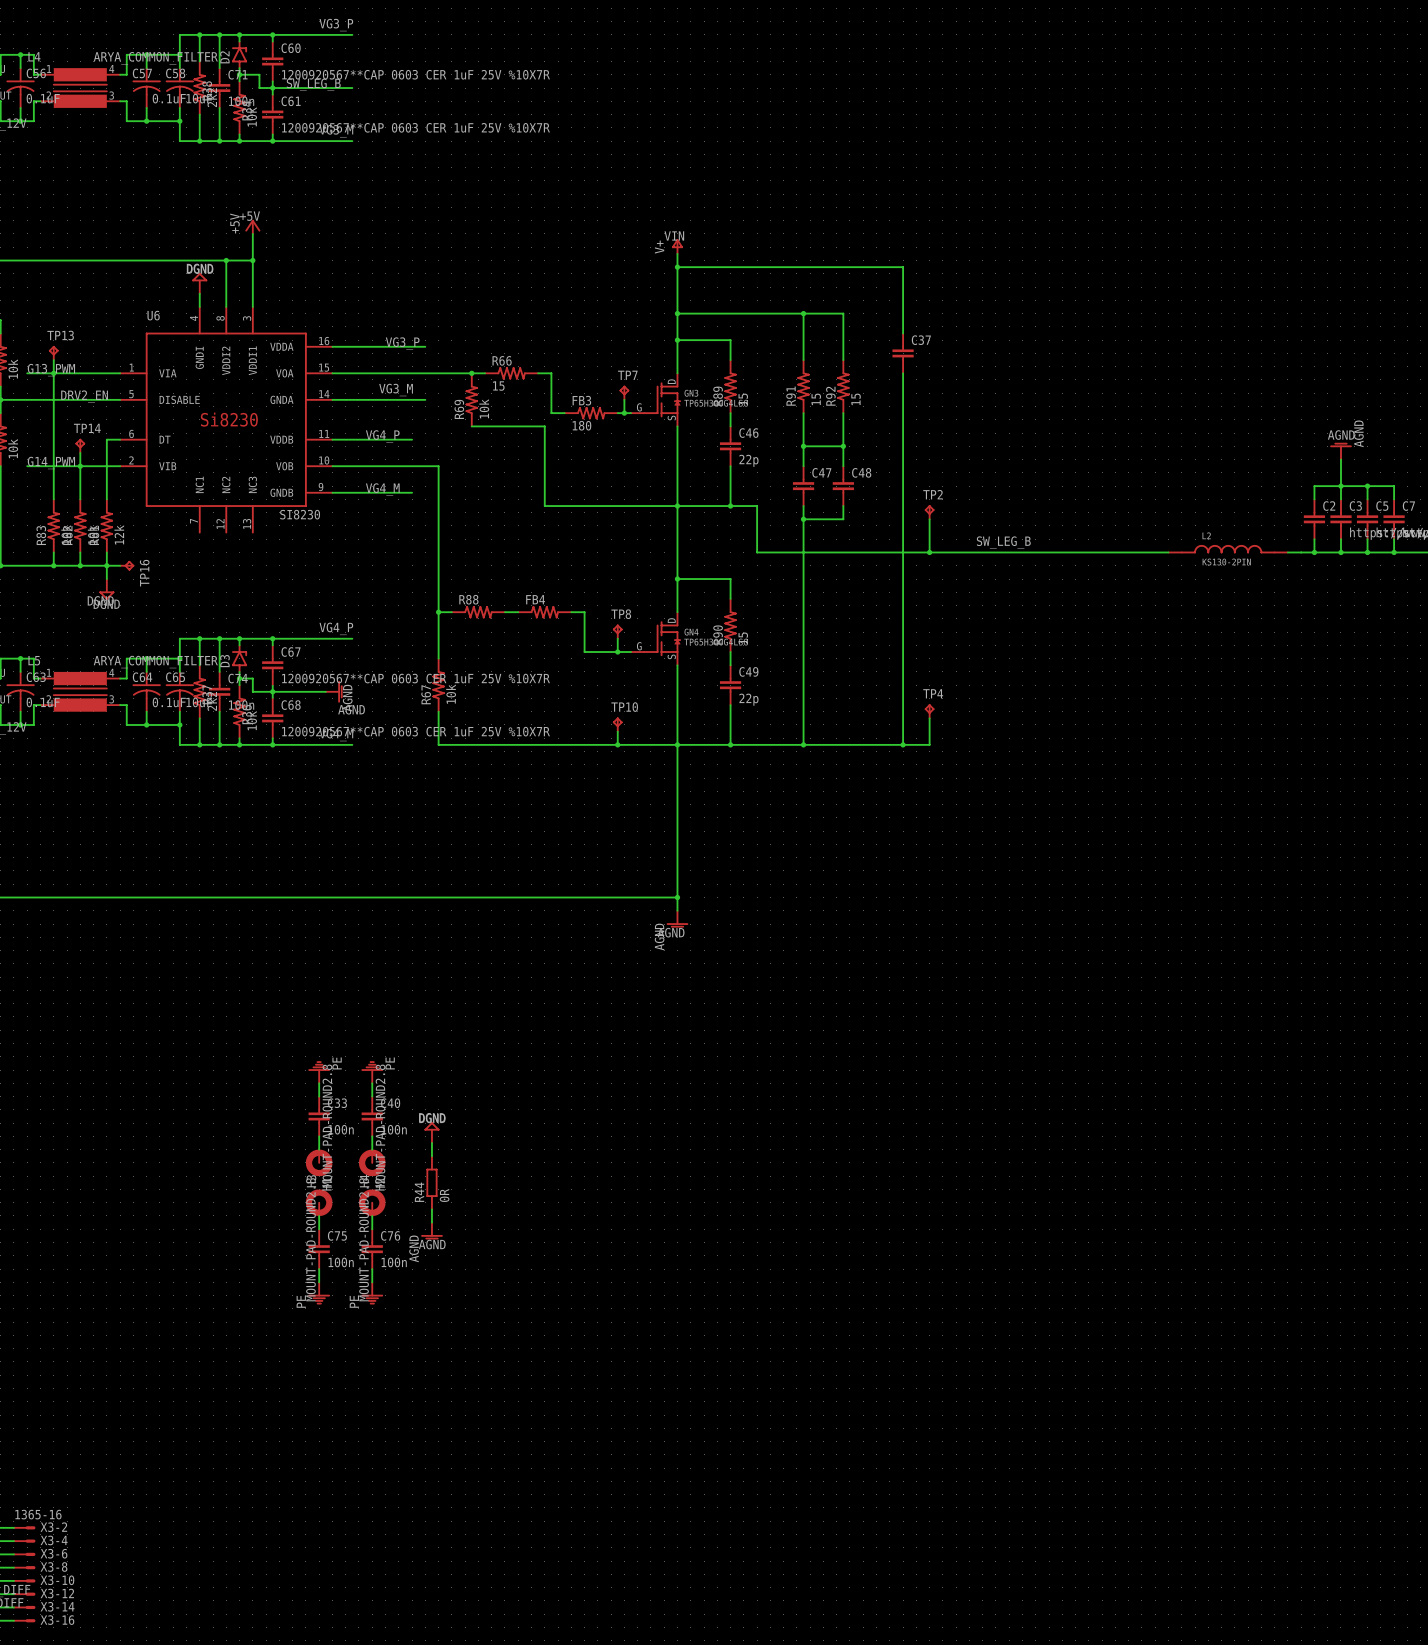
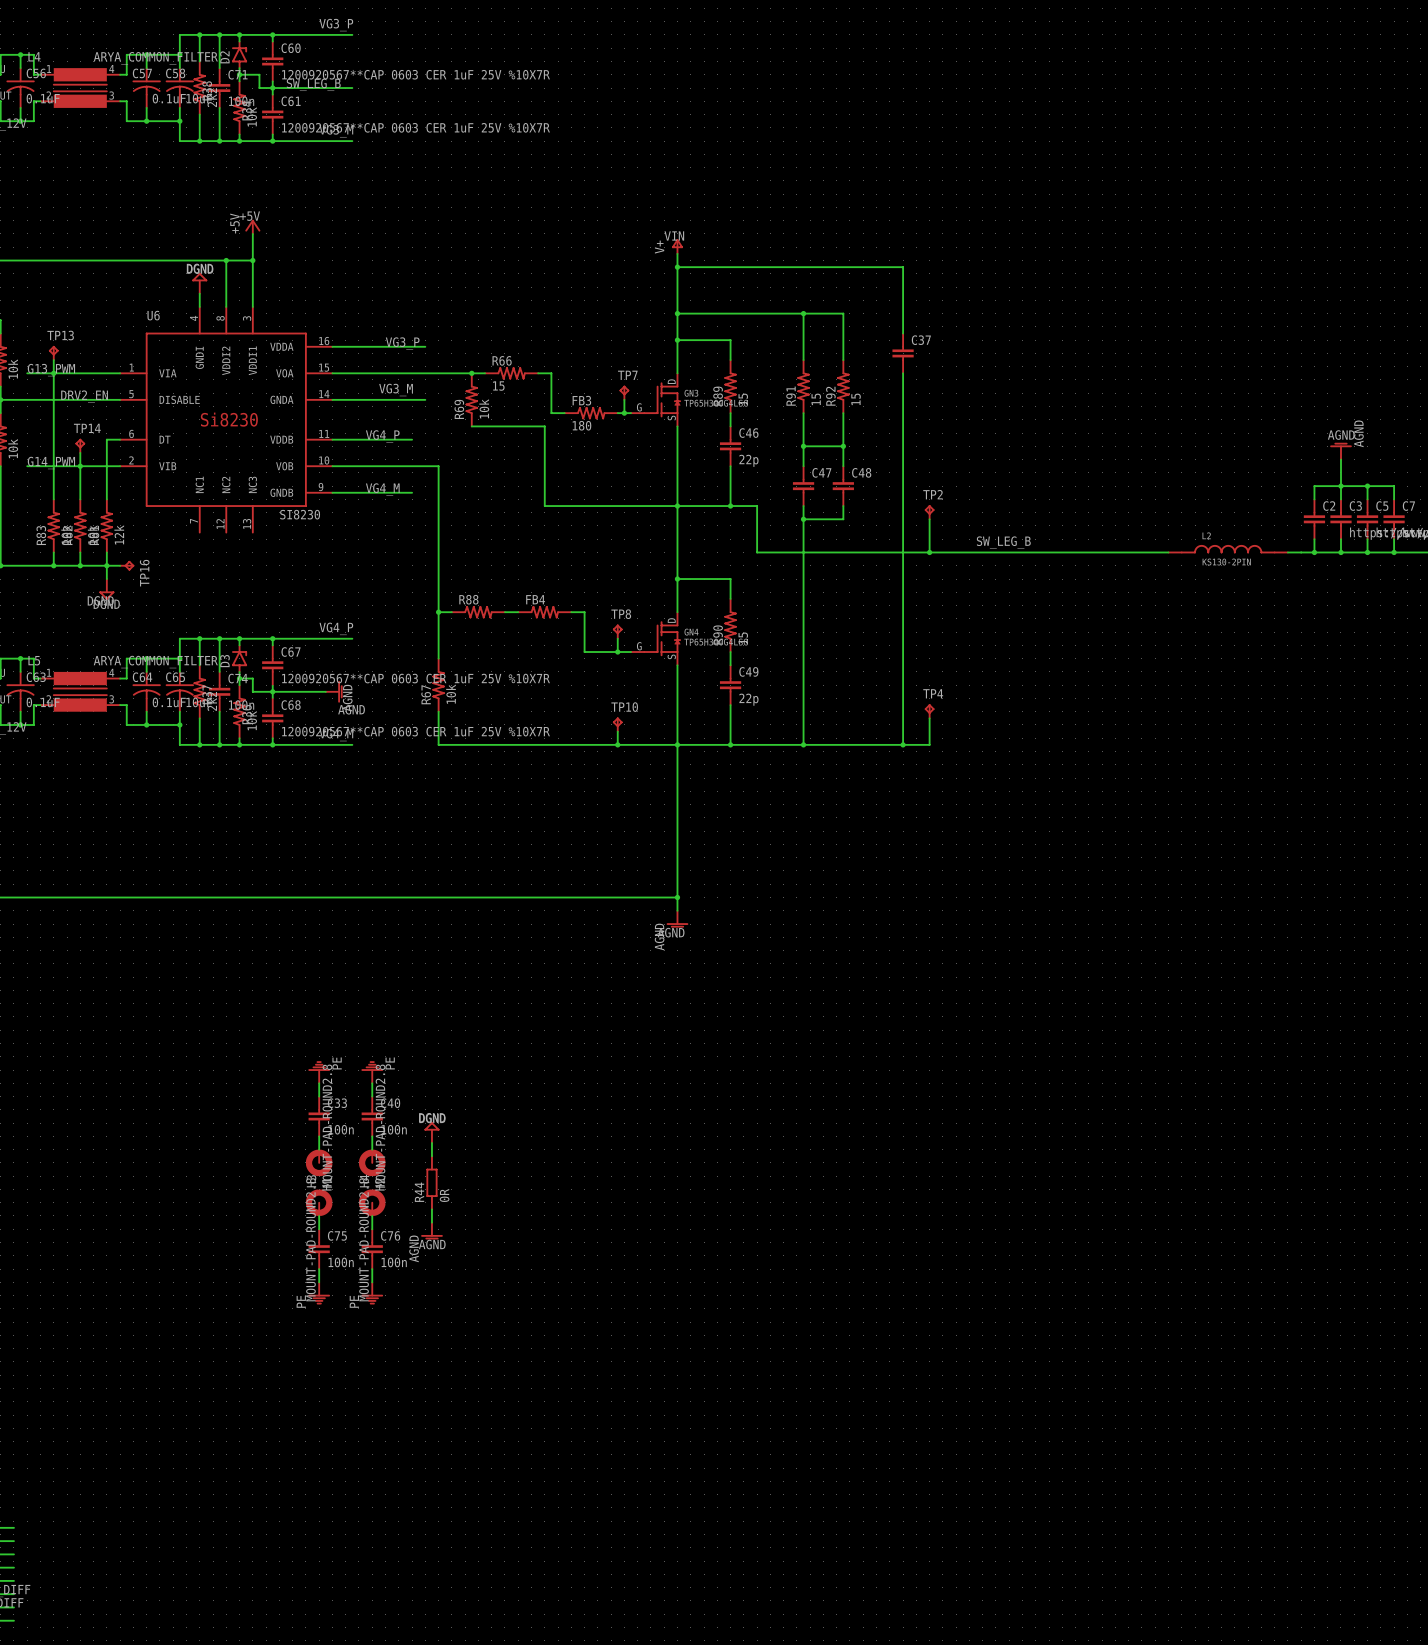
X3-2: 1365-16 (24, 1527) -> none
X3-4: (24, 1541) -> none
X3-6: (24, 1554) -> none
X3-8: (24, 1567) -> none
X3-10: (24, 1580) -> none
X3-12: (24, 1594) -> none
X3-14: (24, 1607) -> none
X3-16: (24, 1620) -> none

